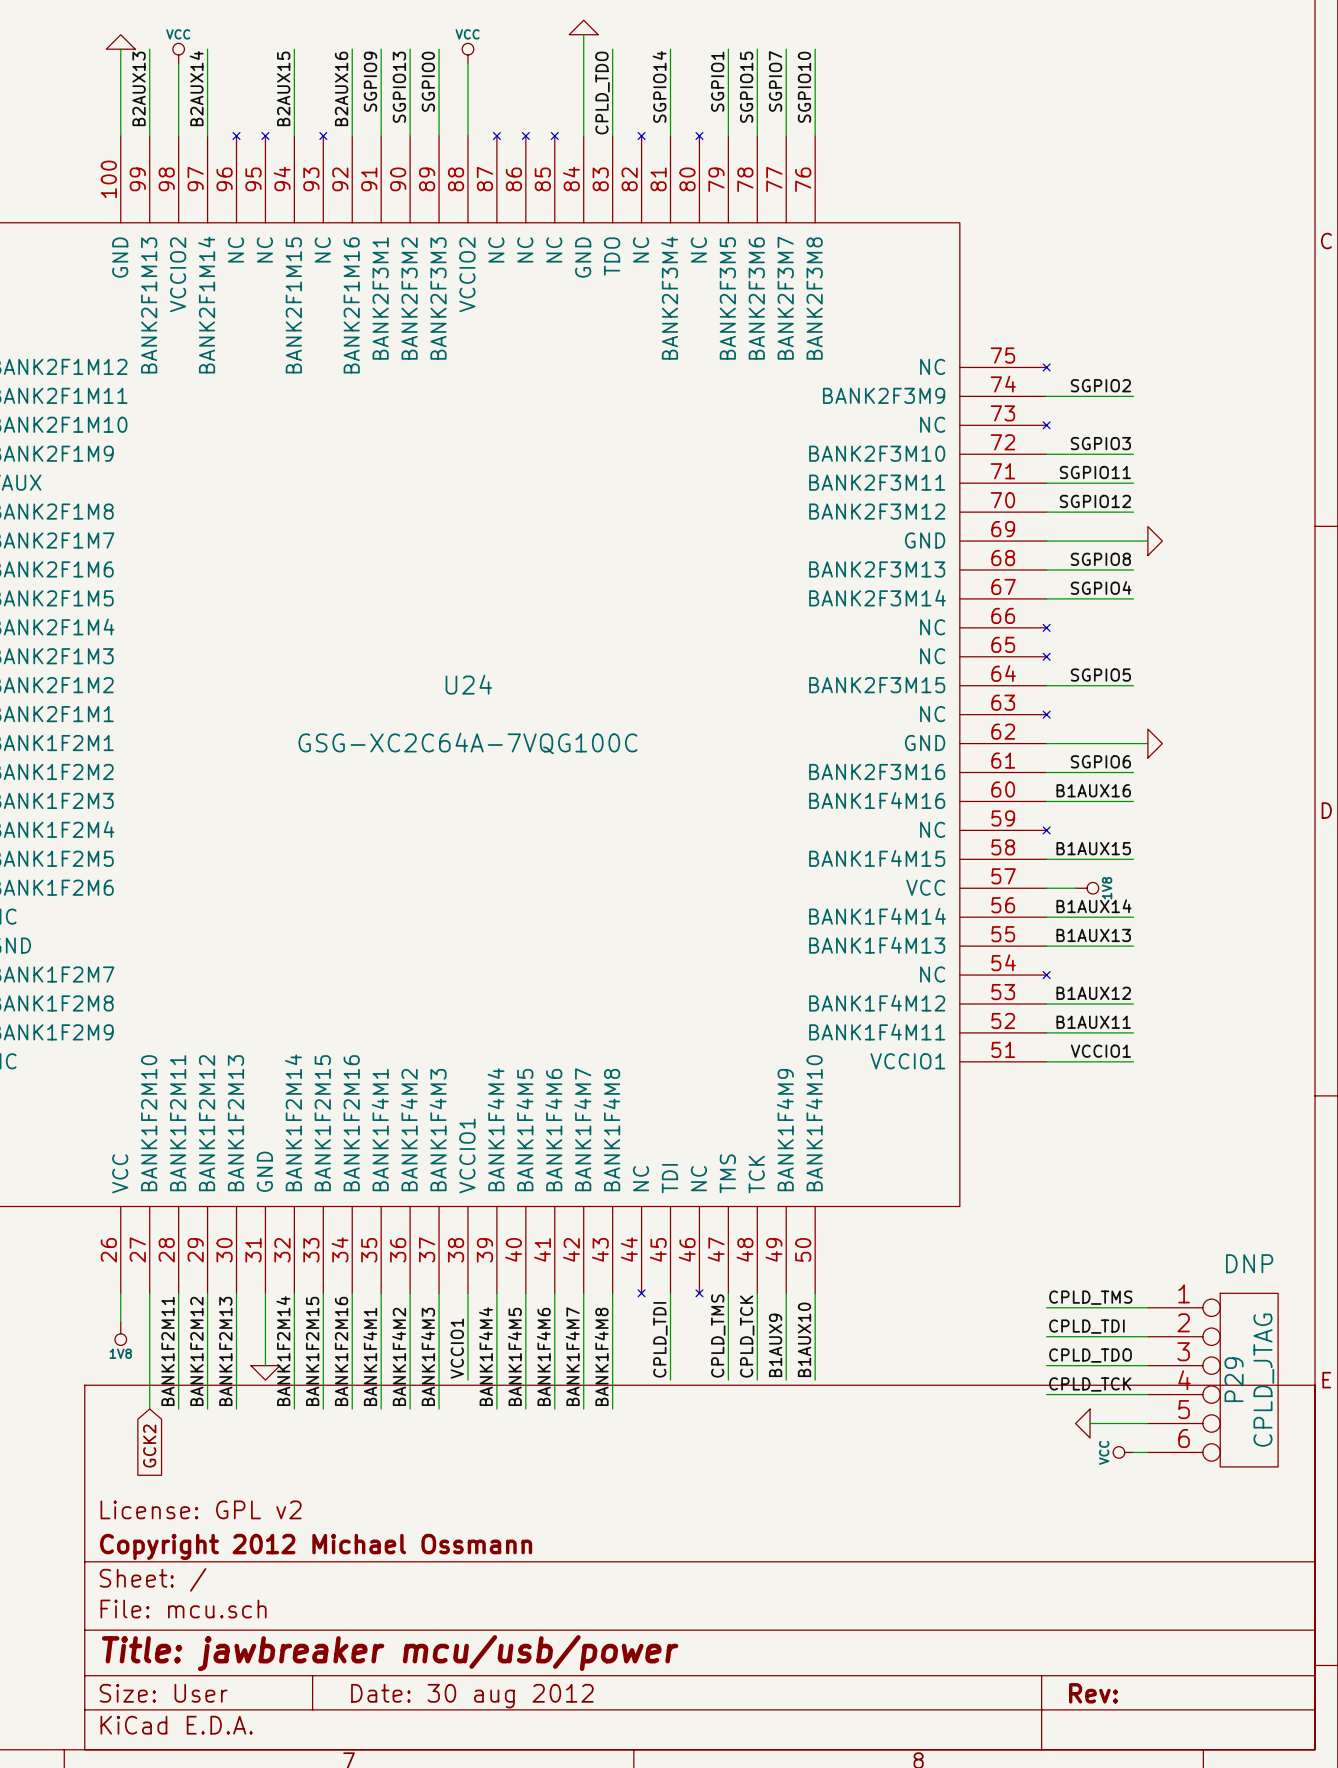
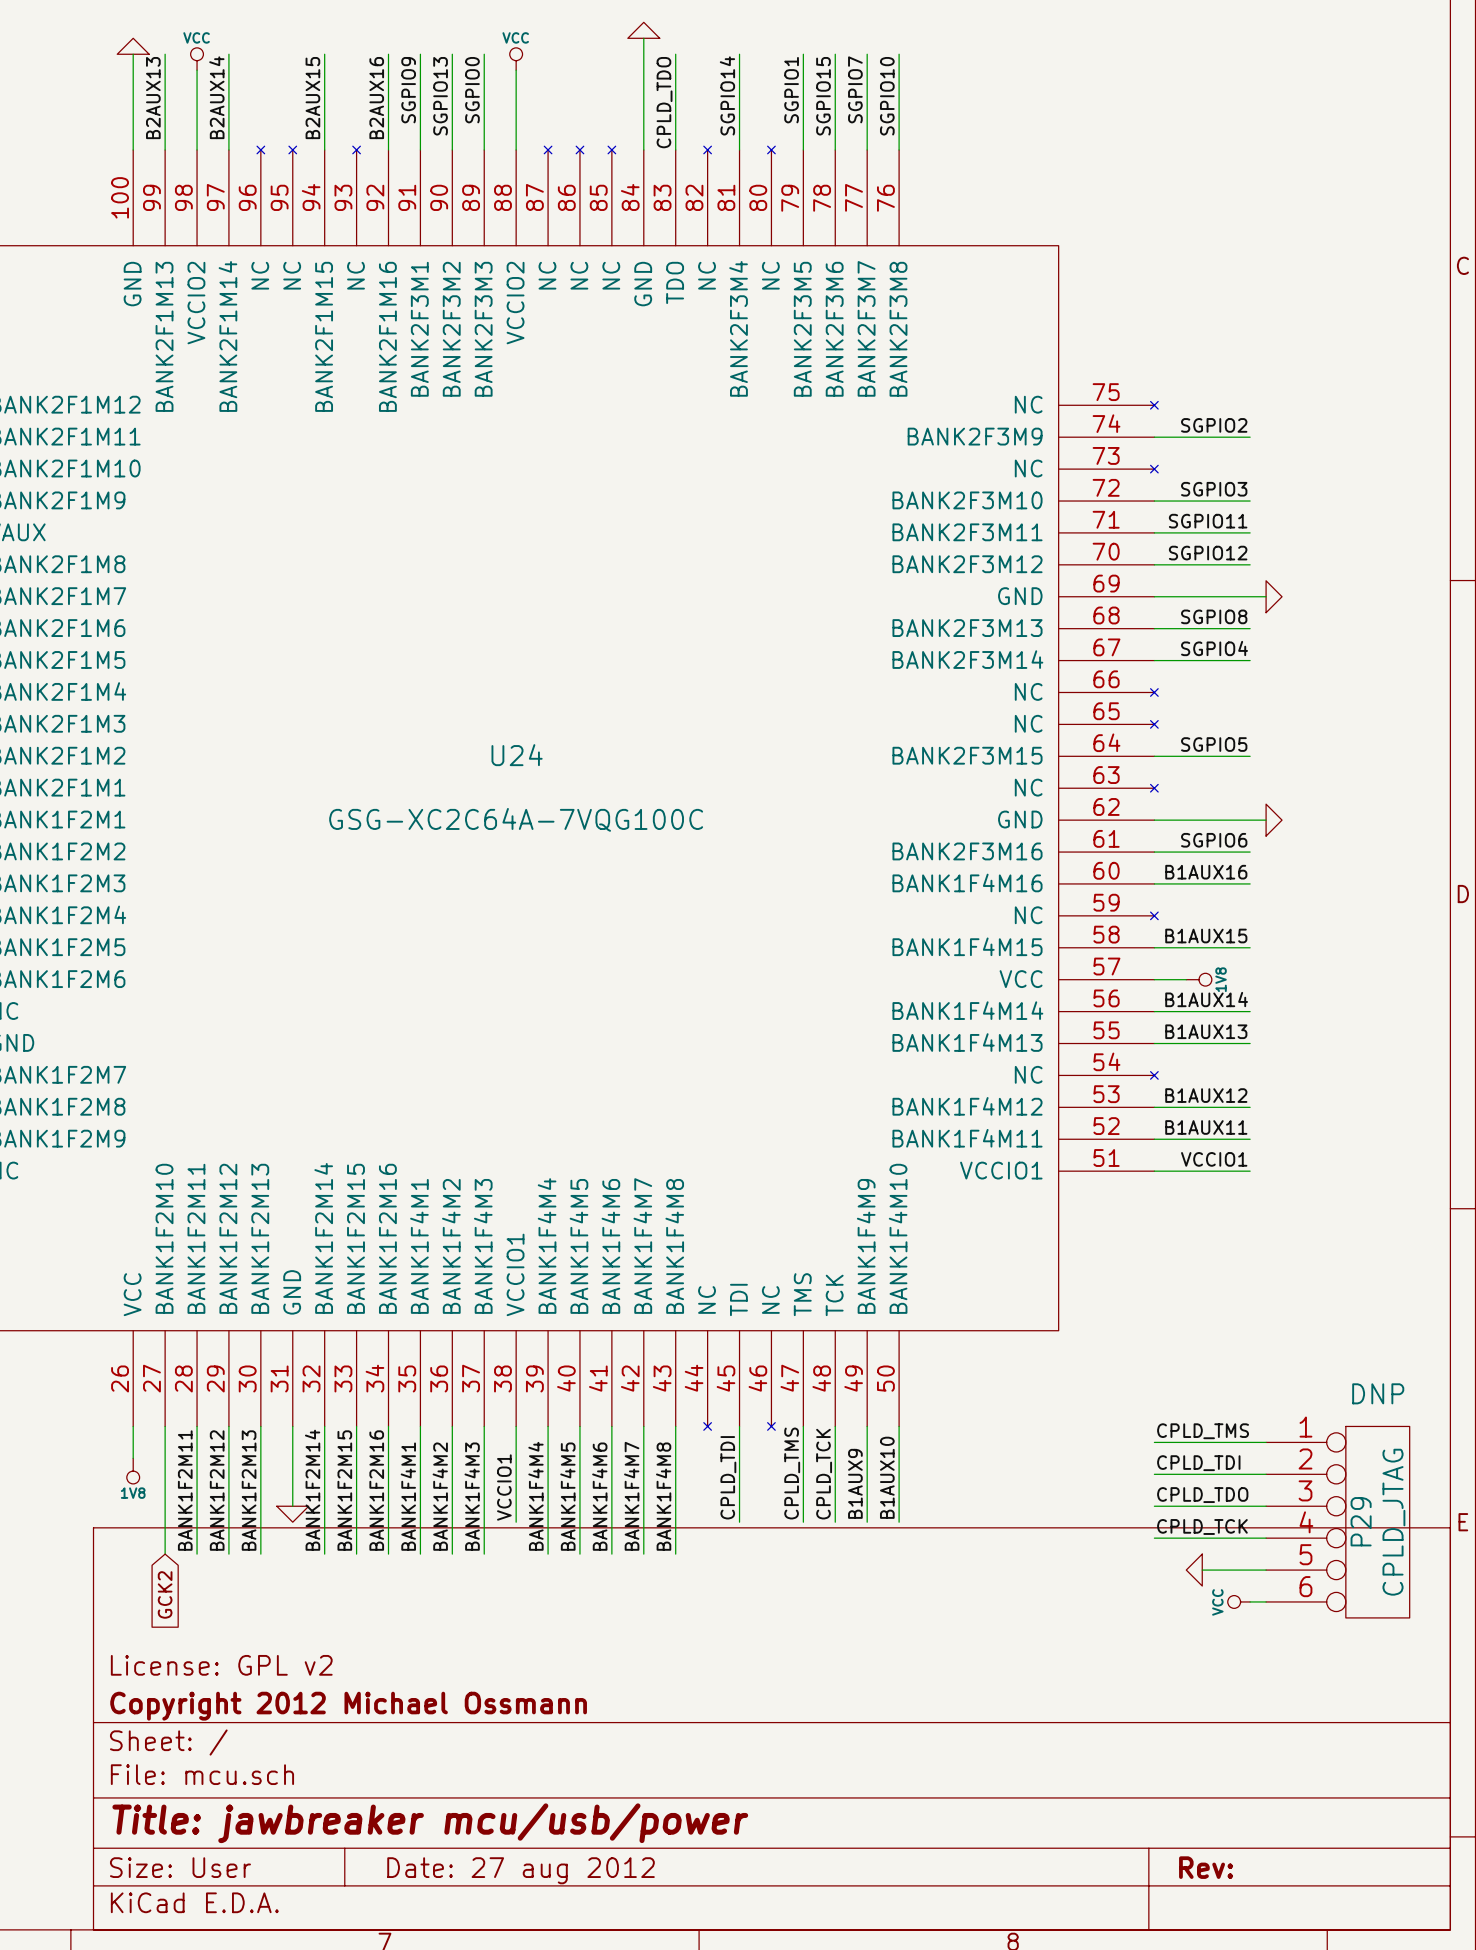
title block: Date: 30 aug 2012 (472, 1696) -> Date: 27 aug 2012 (521, 1870)

